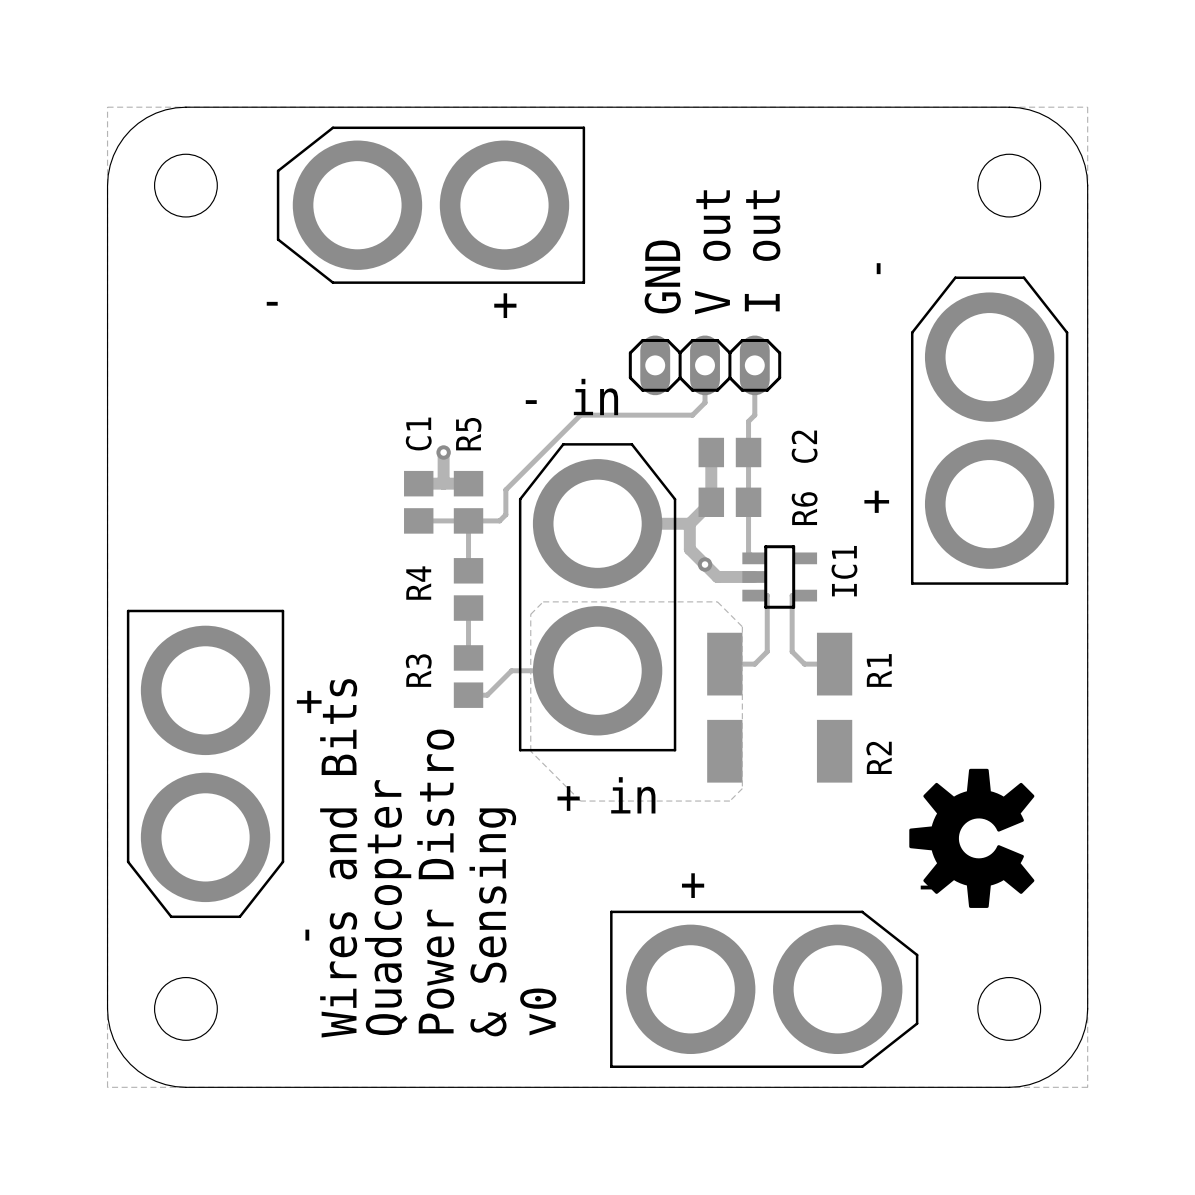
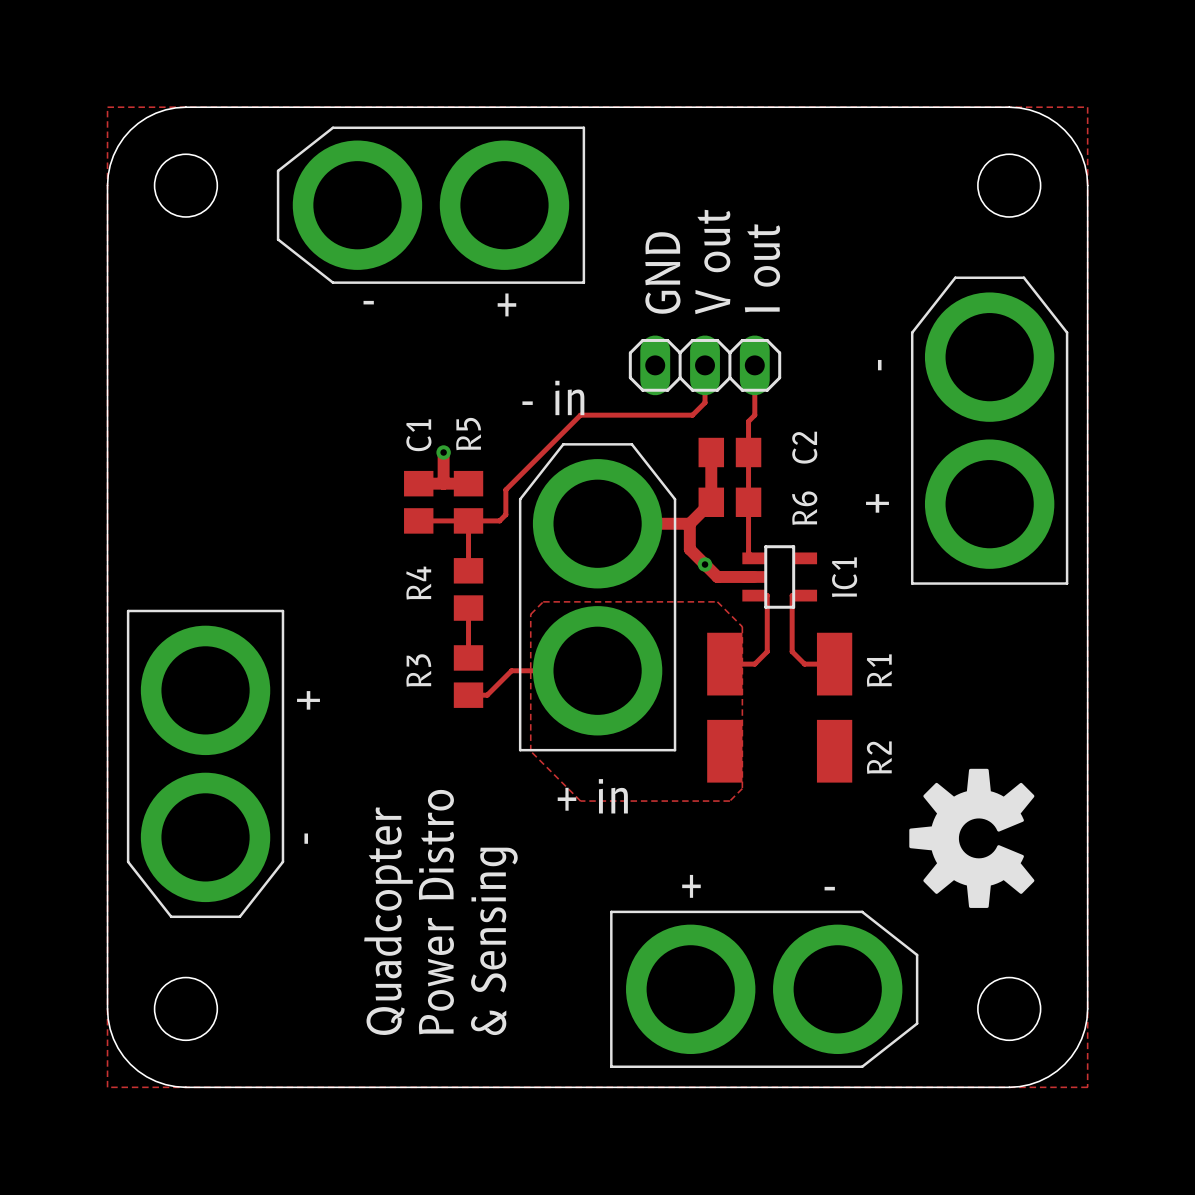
text: Wires and Bits (338, 858) -> none
text: v0 (538, 1011) -> none

